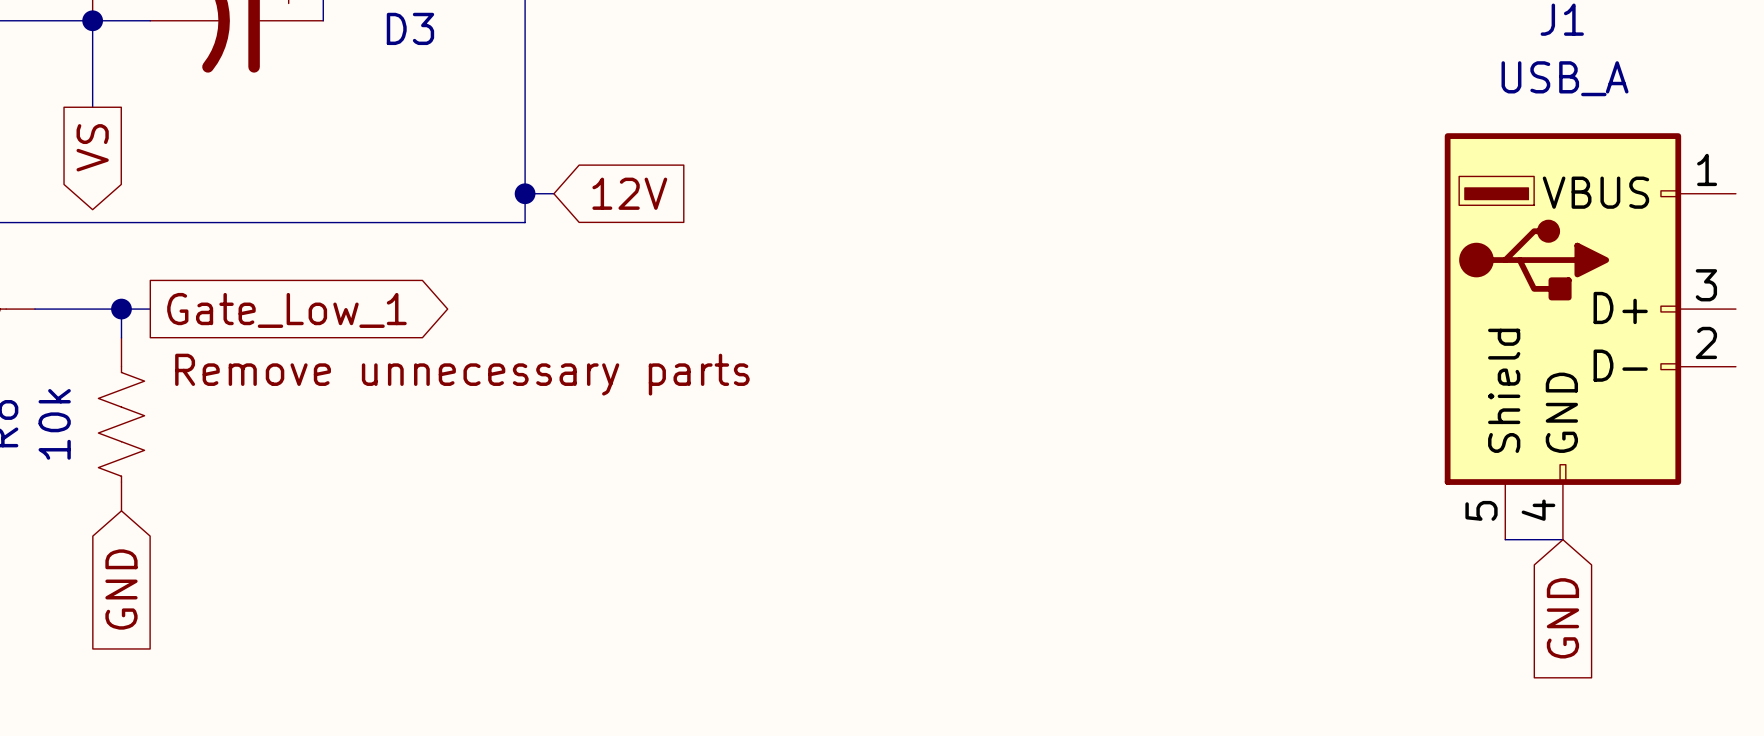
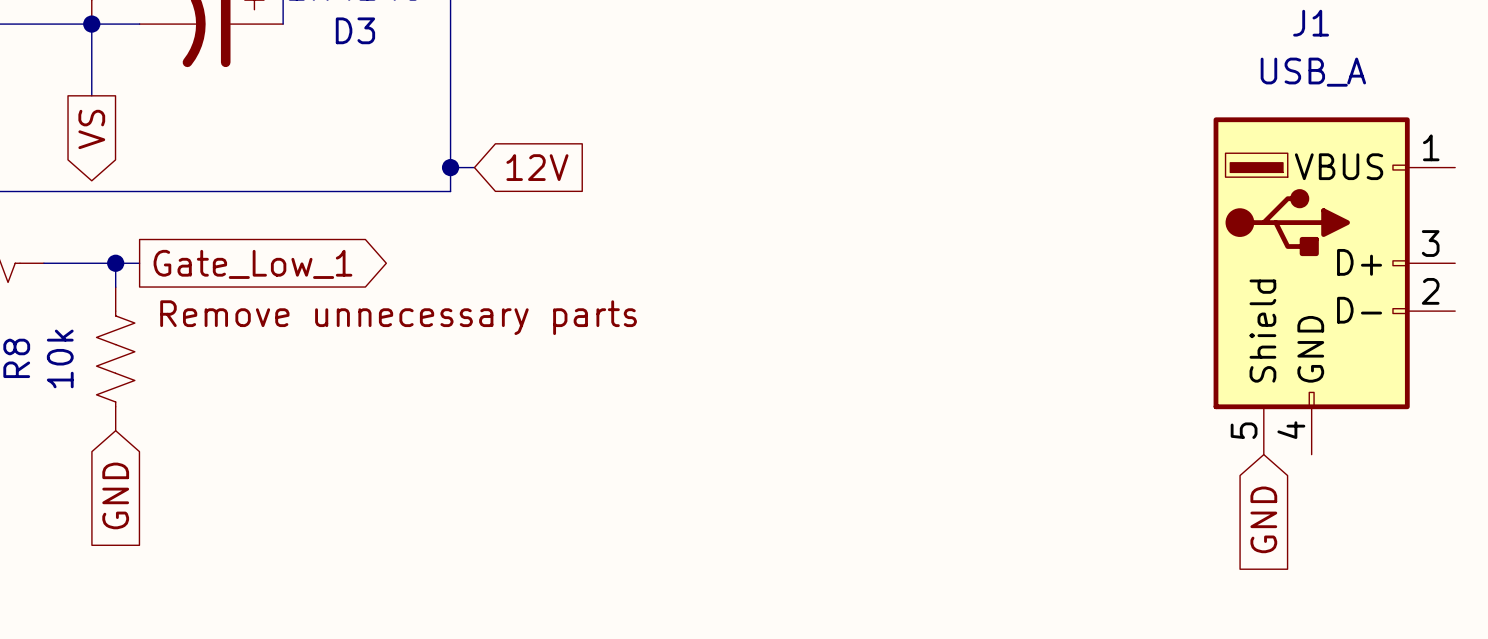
wire: (1505, 539) (1562, 539) -> none
global label position: GND (1562, 618) -> GND (1263, 519)

